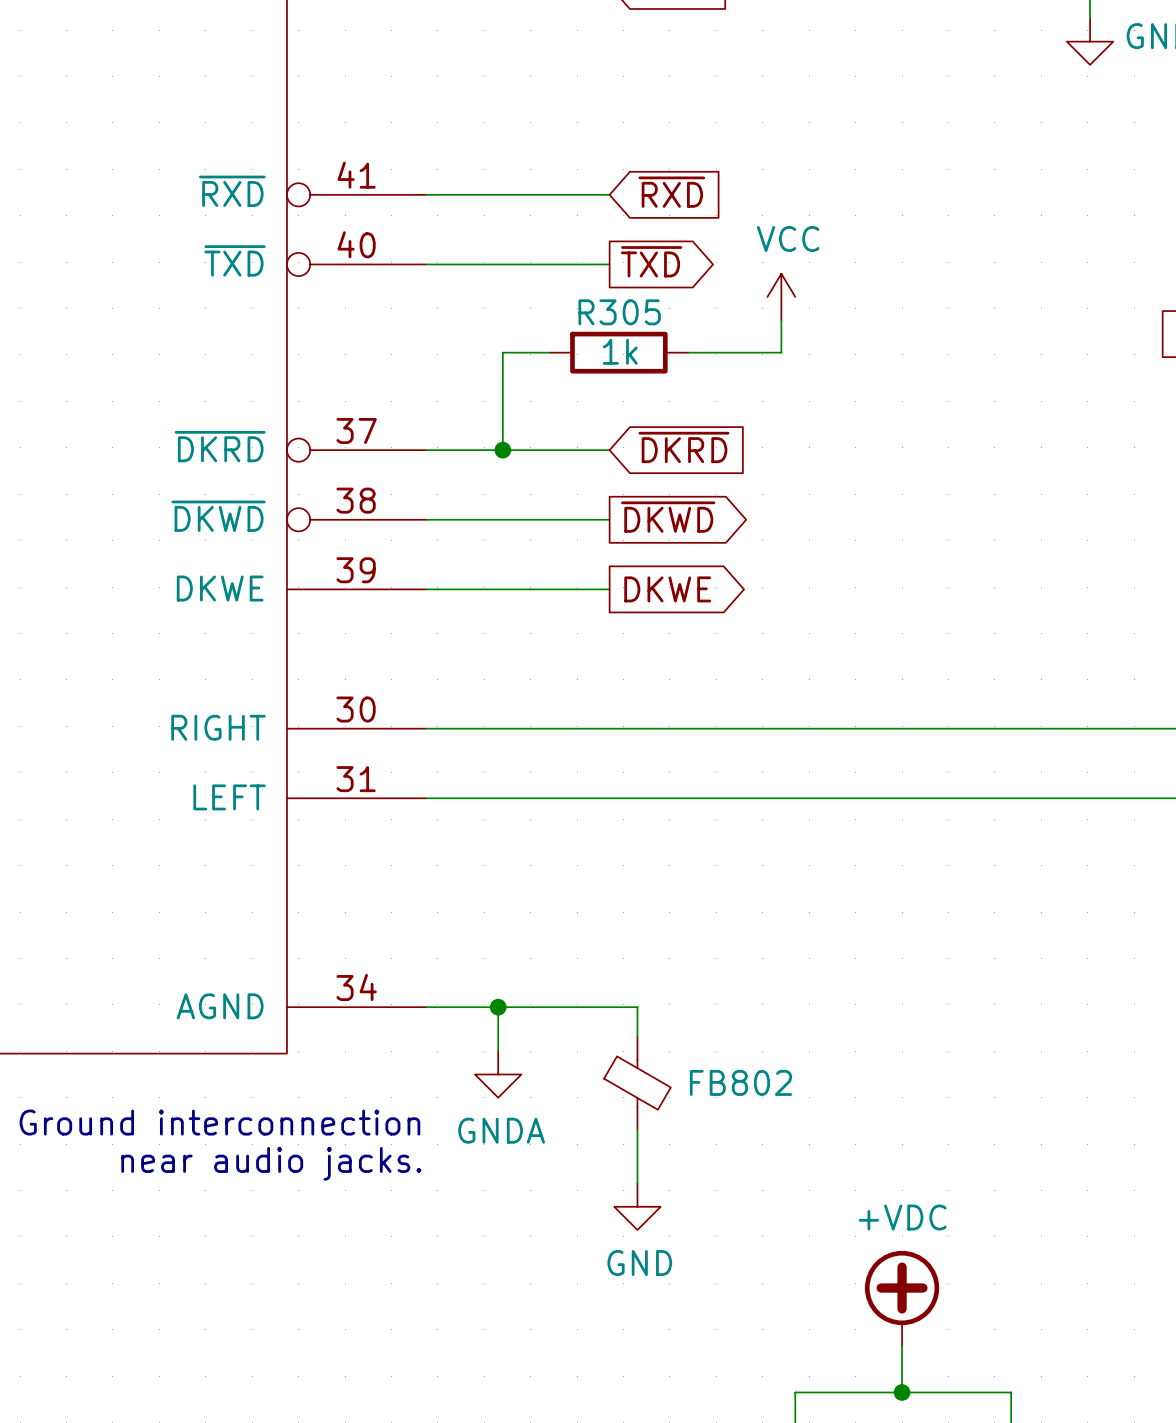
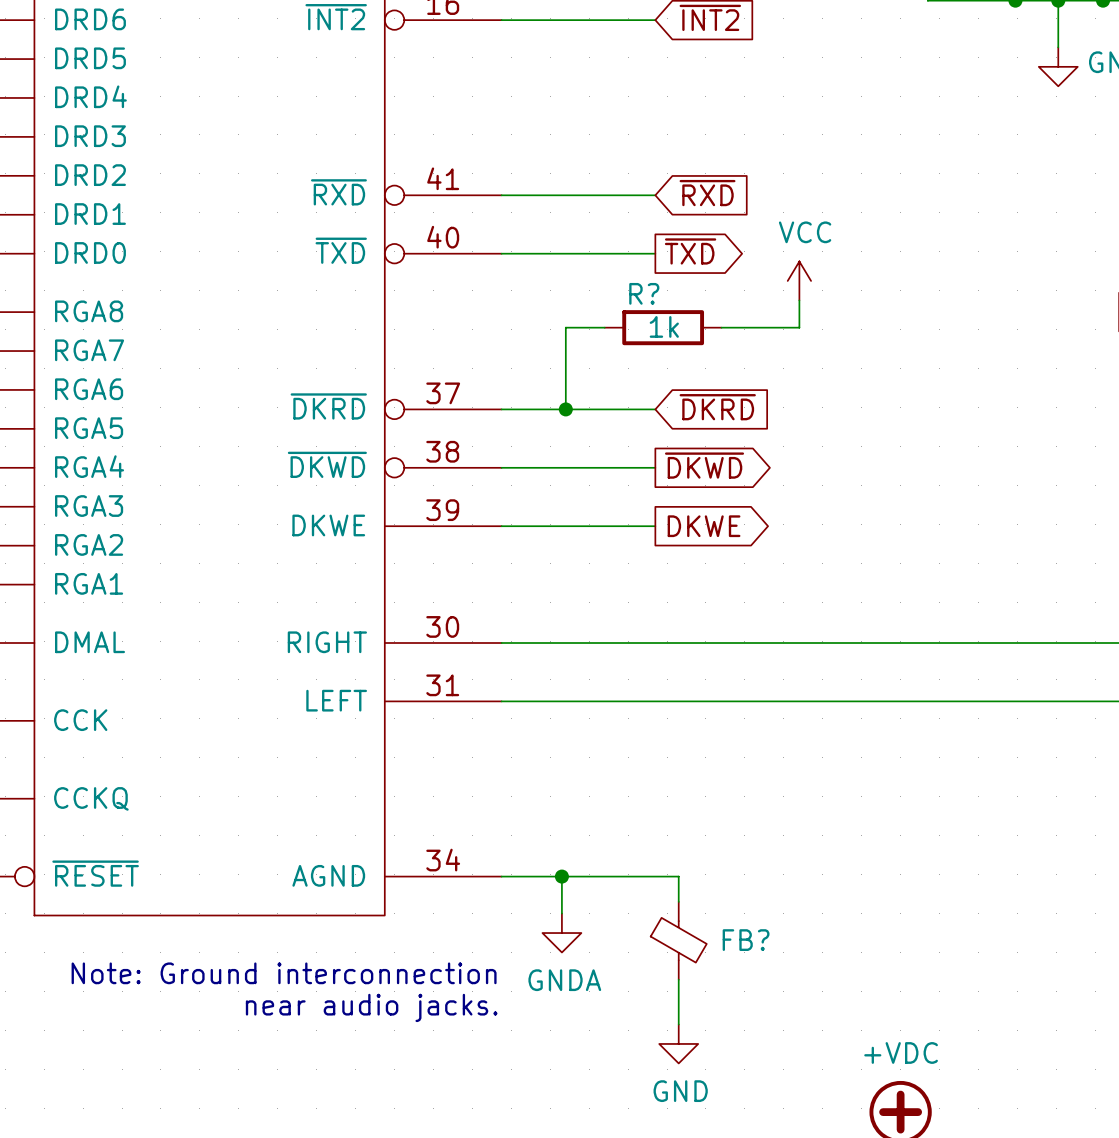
R305 name: R305 (619, 312) -> R? (644, 293)
FB802 name: FB802 (740, 1082) -> FB? (746, 940)

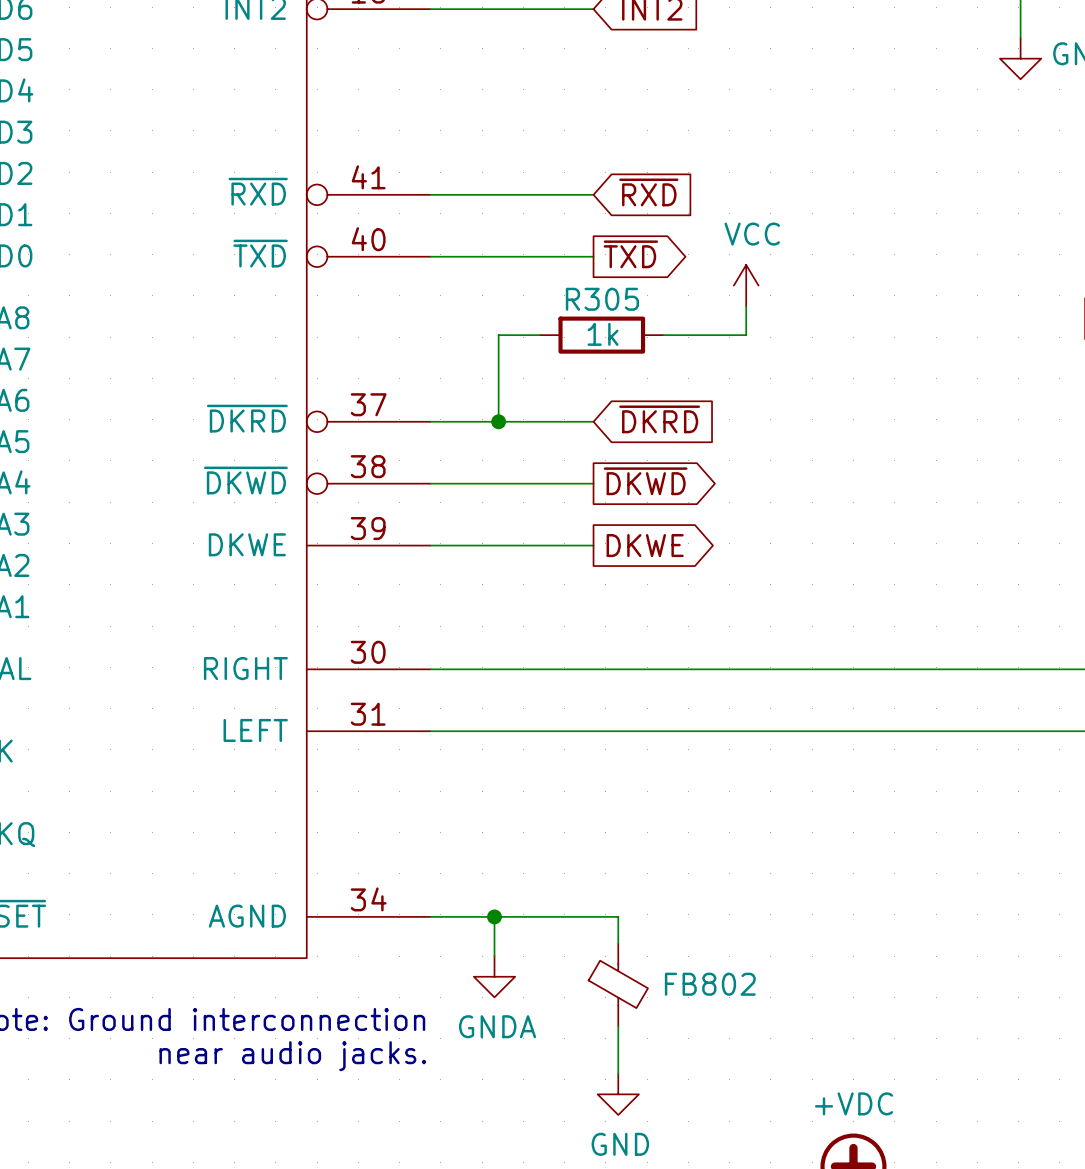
R? name: R? (644, 293) -> R305 (602, 299)
FB? name: FB? (746, 940) -> FB802 (710, 984)

